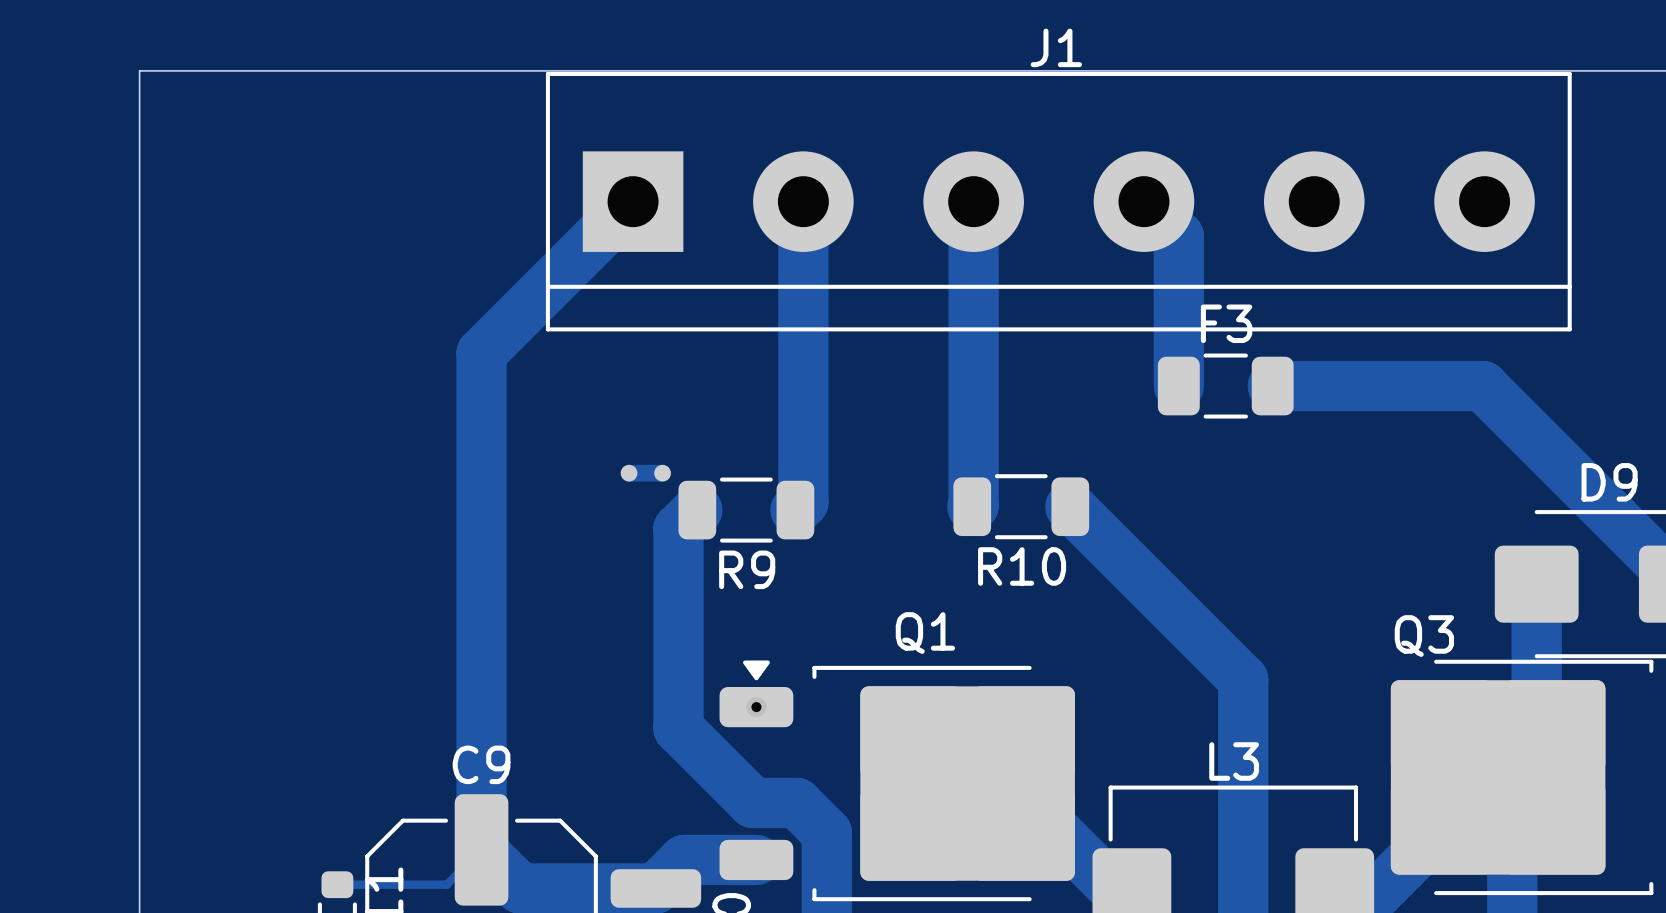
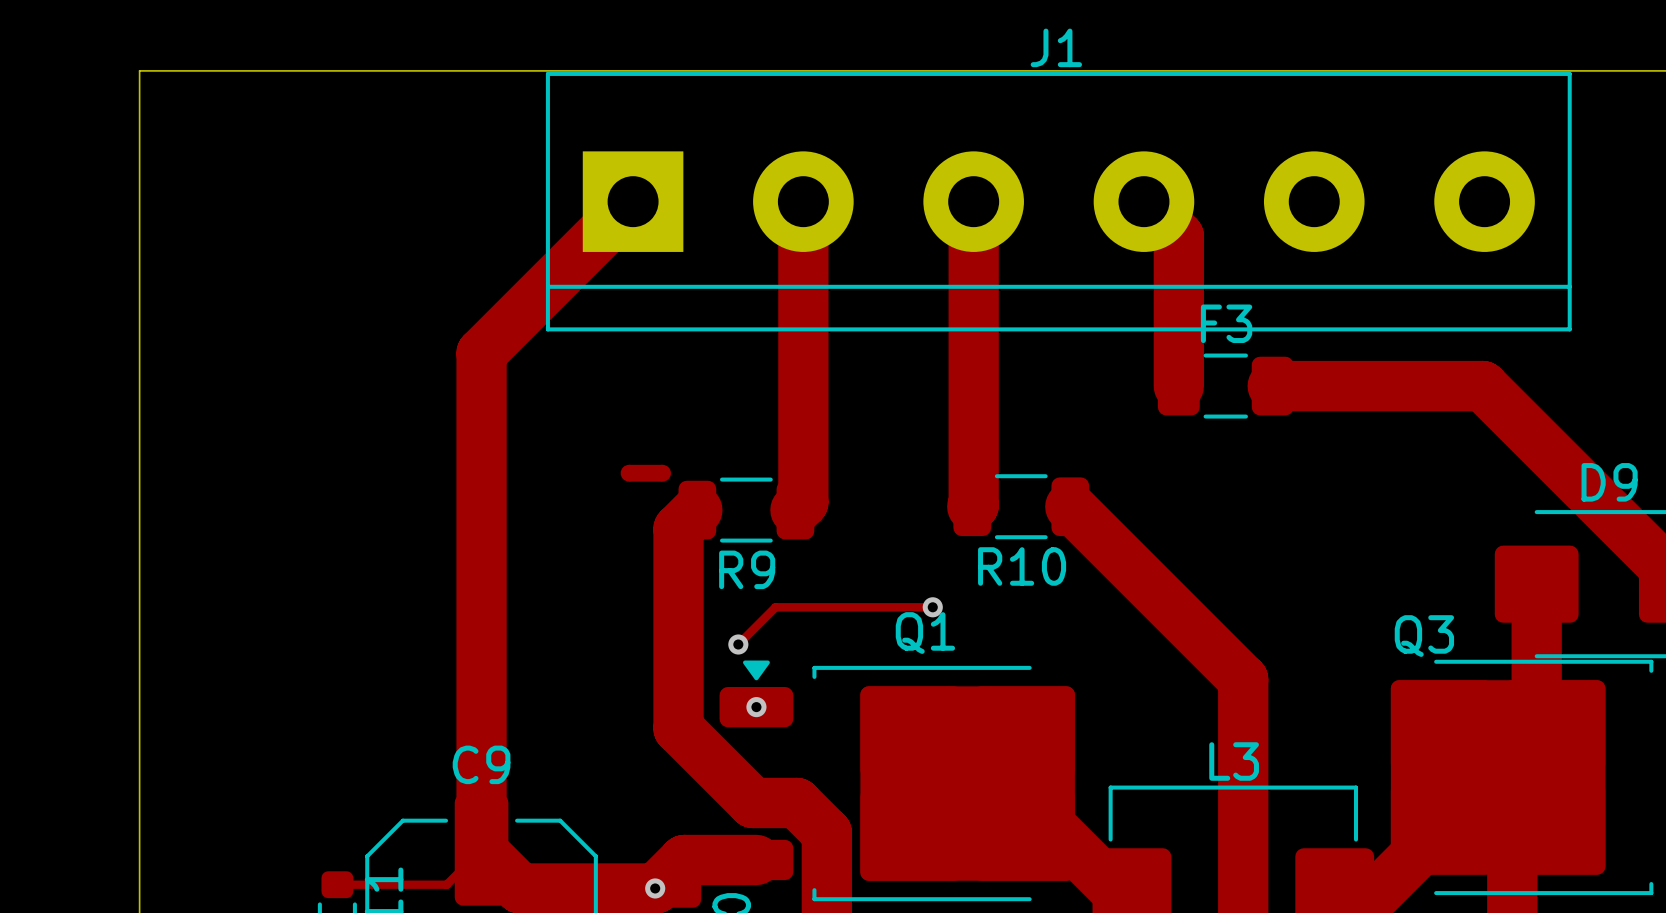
track: none -> (932, 607) (775, 607) (738, 644)
via: none -> (932, 607)
via: none -> (738, 644)
via: none -> (655, 888)

